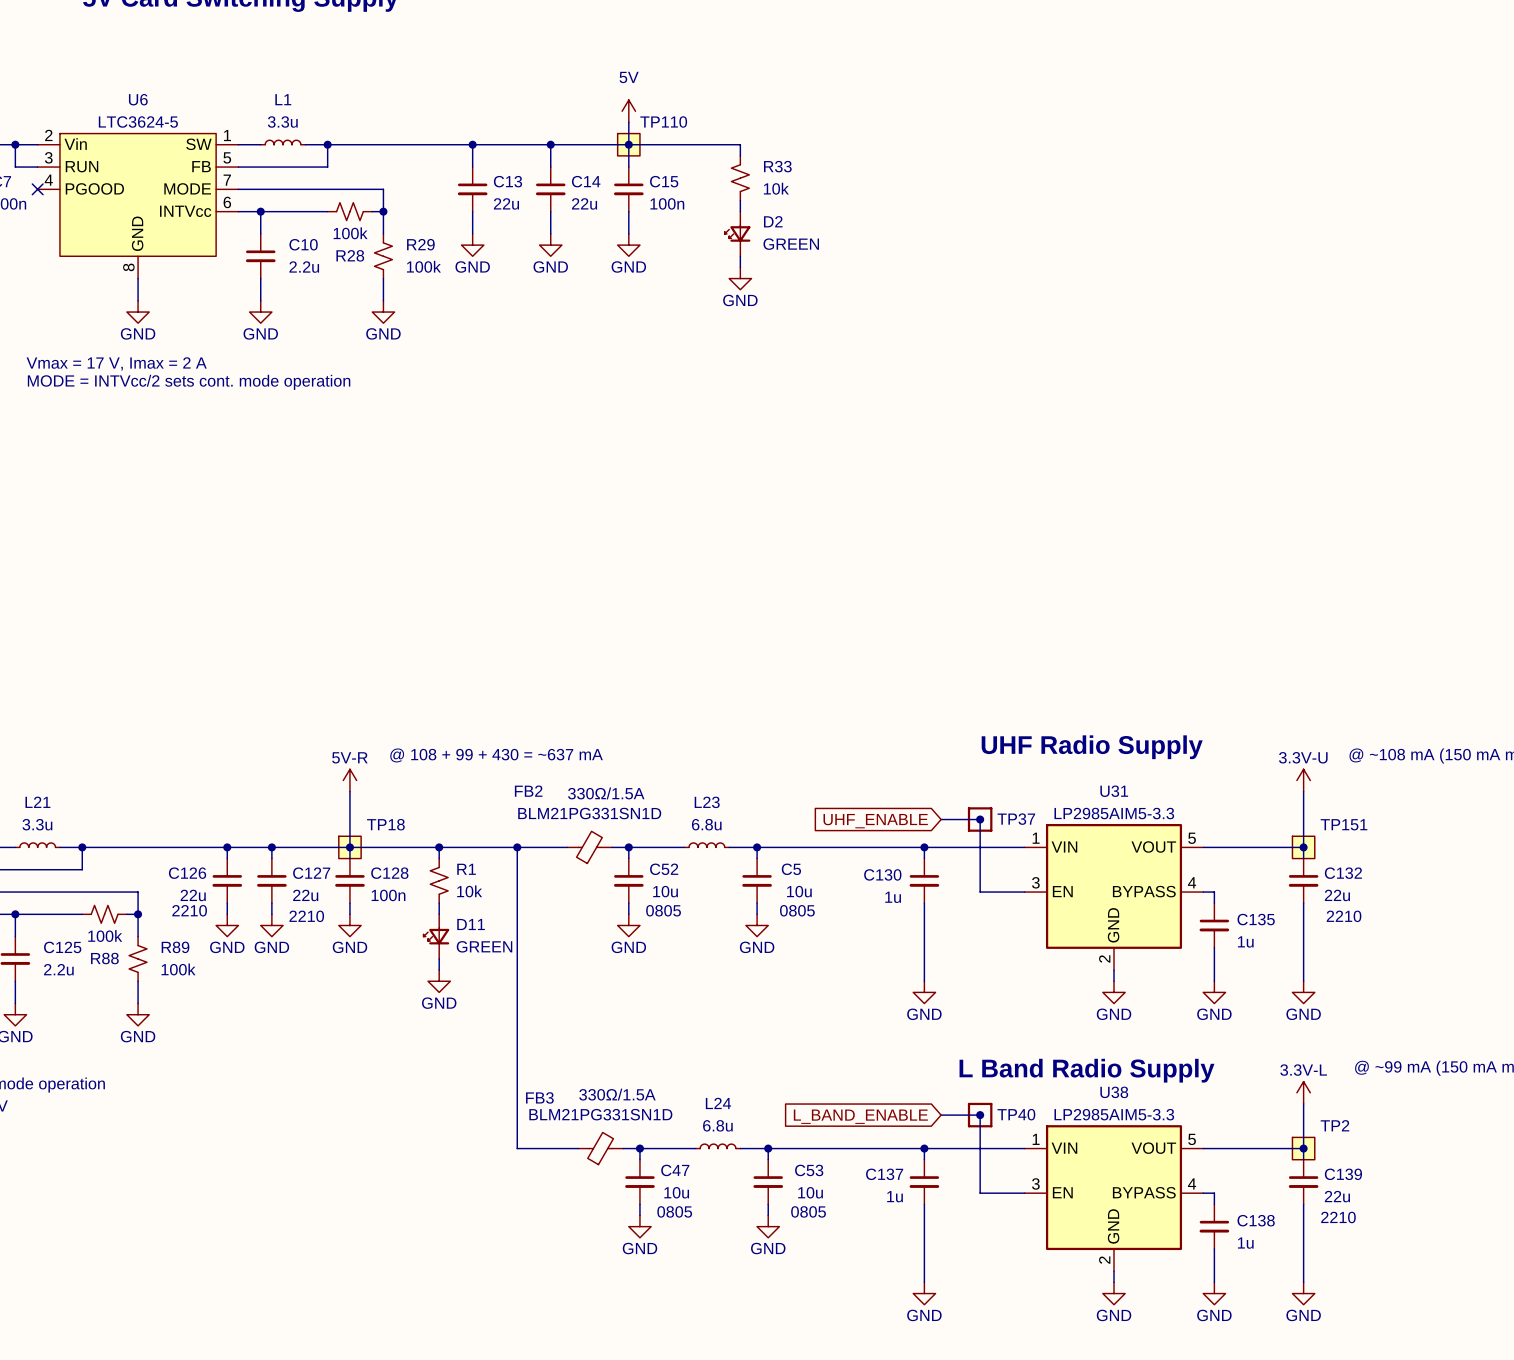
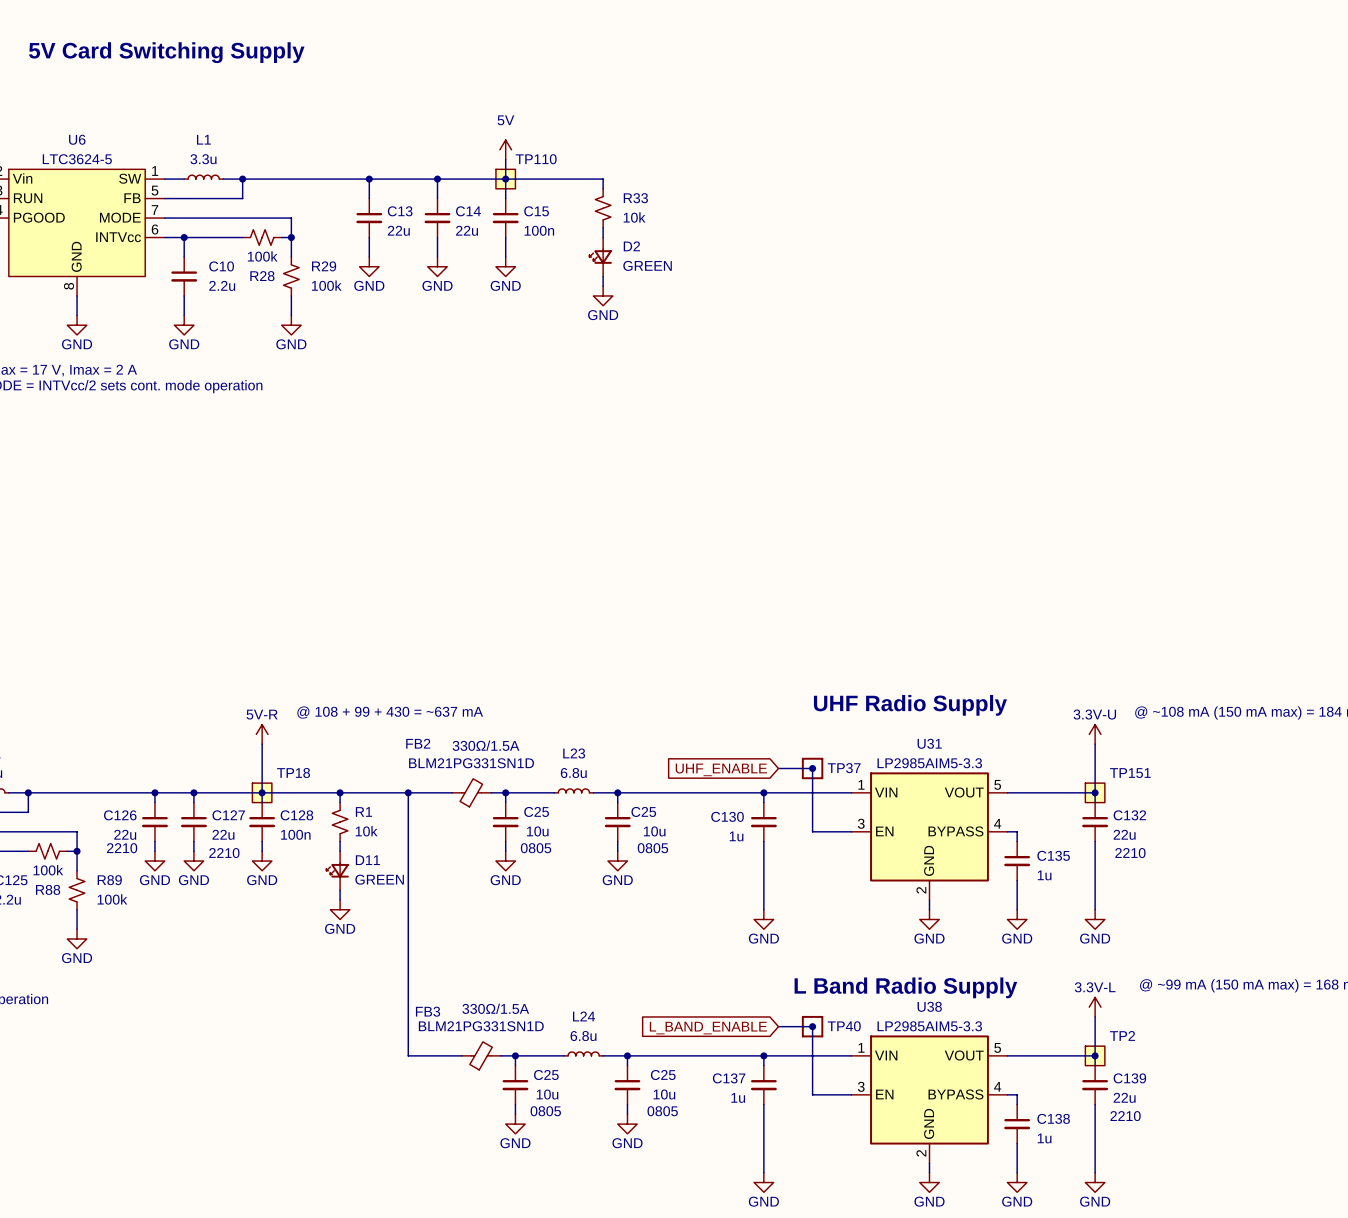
C52 name: C52 (664, 869) -> C25 (536, 811)
C5 name: C5 (791, 869) -> C25 (643, 811)
C47 name: C47 (675, 1170) -> C25 (546, 1075)
C53 name: C53 (809, 1170) -> C25 (663, 1075)

